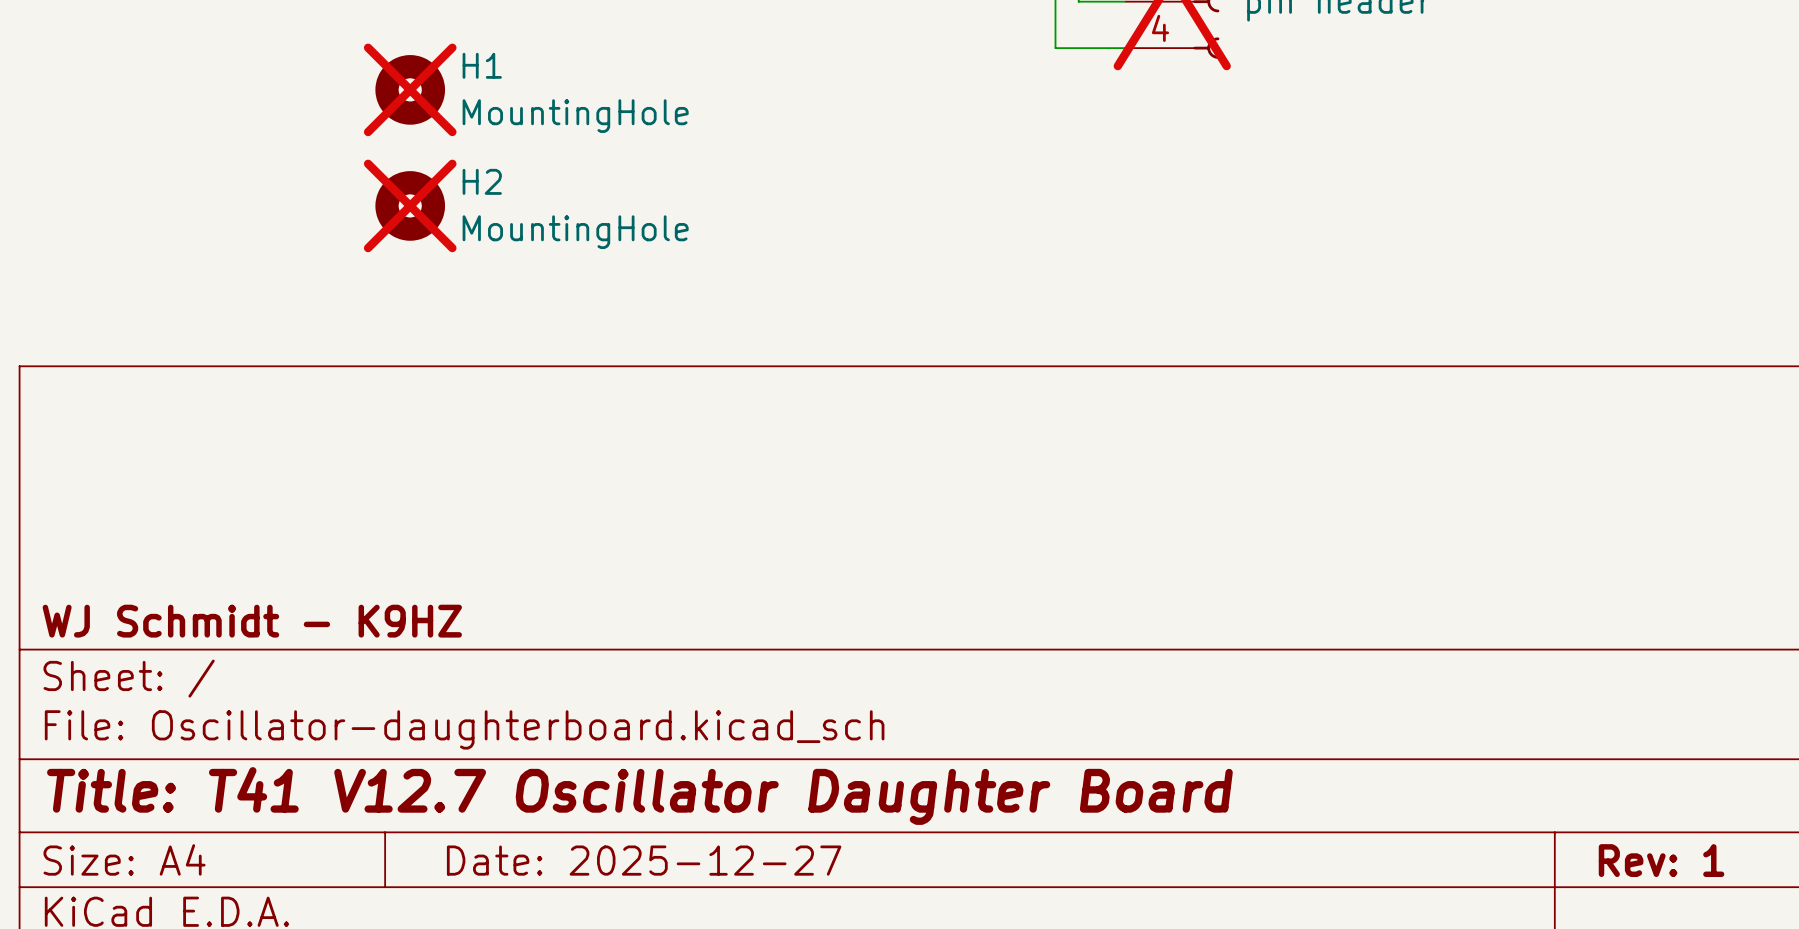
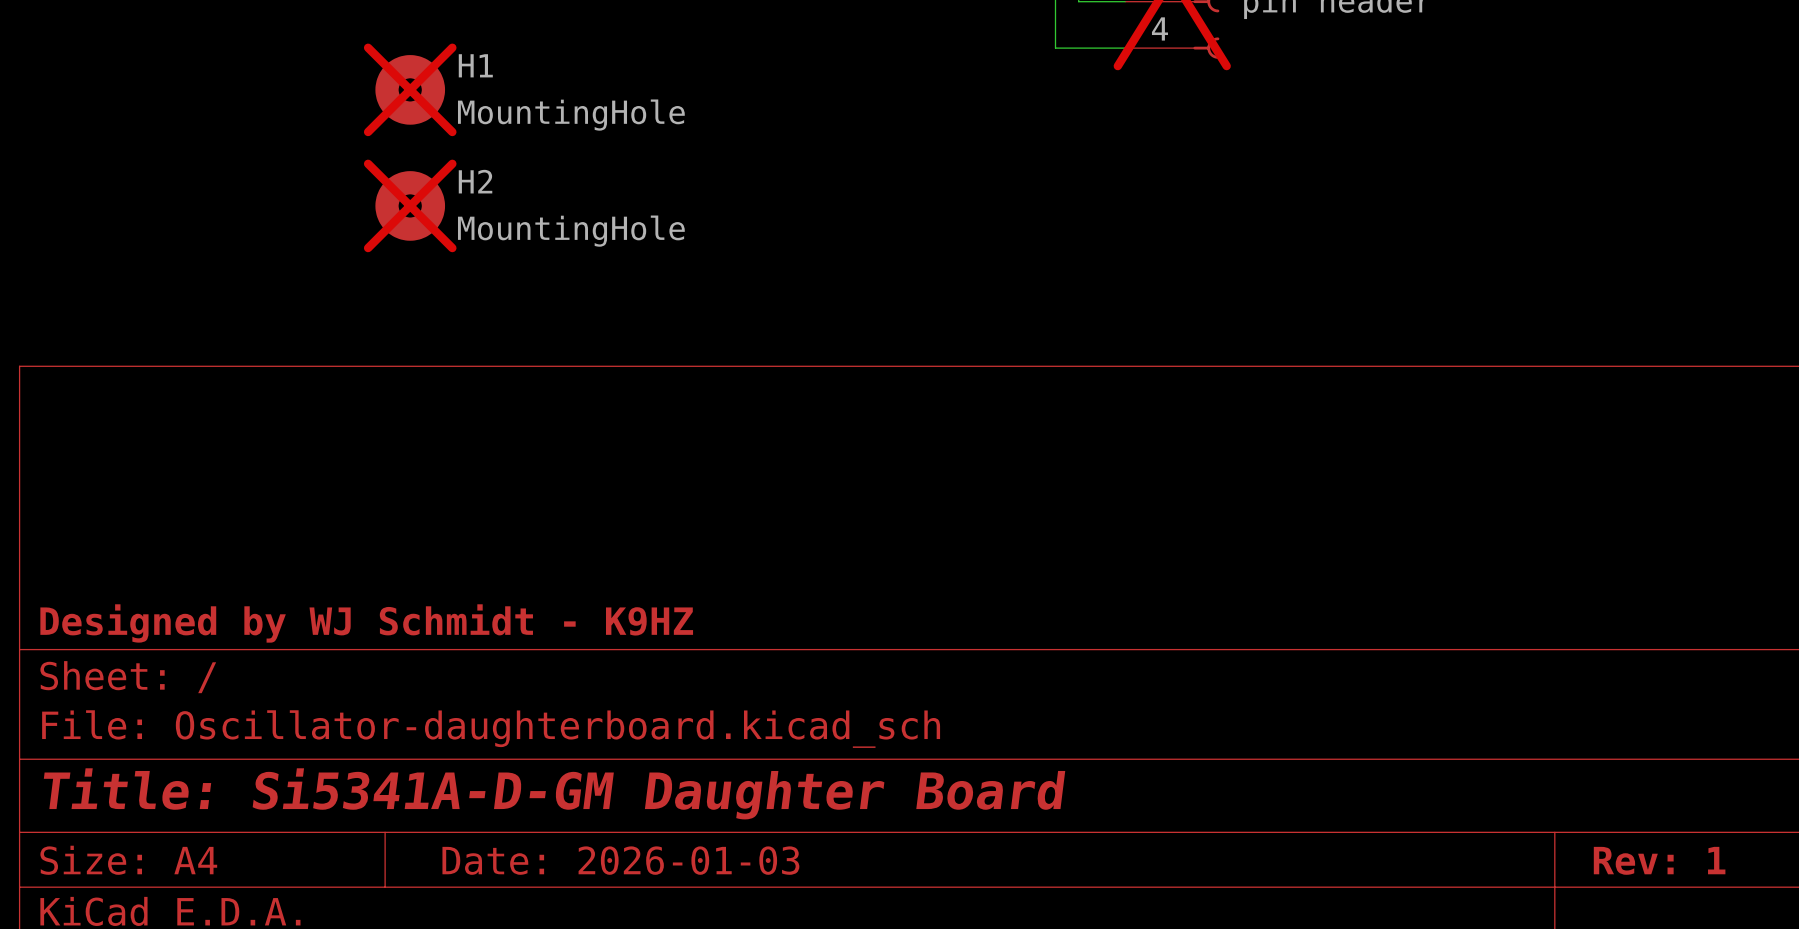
title block: WJ Schmidt - K9HZ (252, 621) -> Designed by WJ Schmidt - K9HZ (366, 623)
title block: Title: T41 V12.7 Oscillator Daughter Board (639, 796) -> Title: Si5341A-D-GM Daughter Board (554, 793)
title block: Date: 2025-12-27 (644, 860) -> Date: 2026-01-03 (620, 860)

